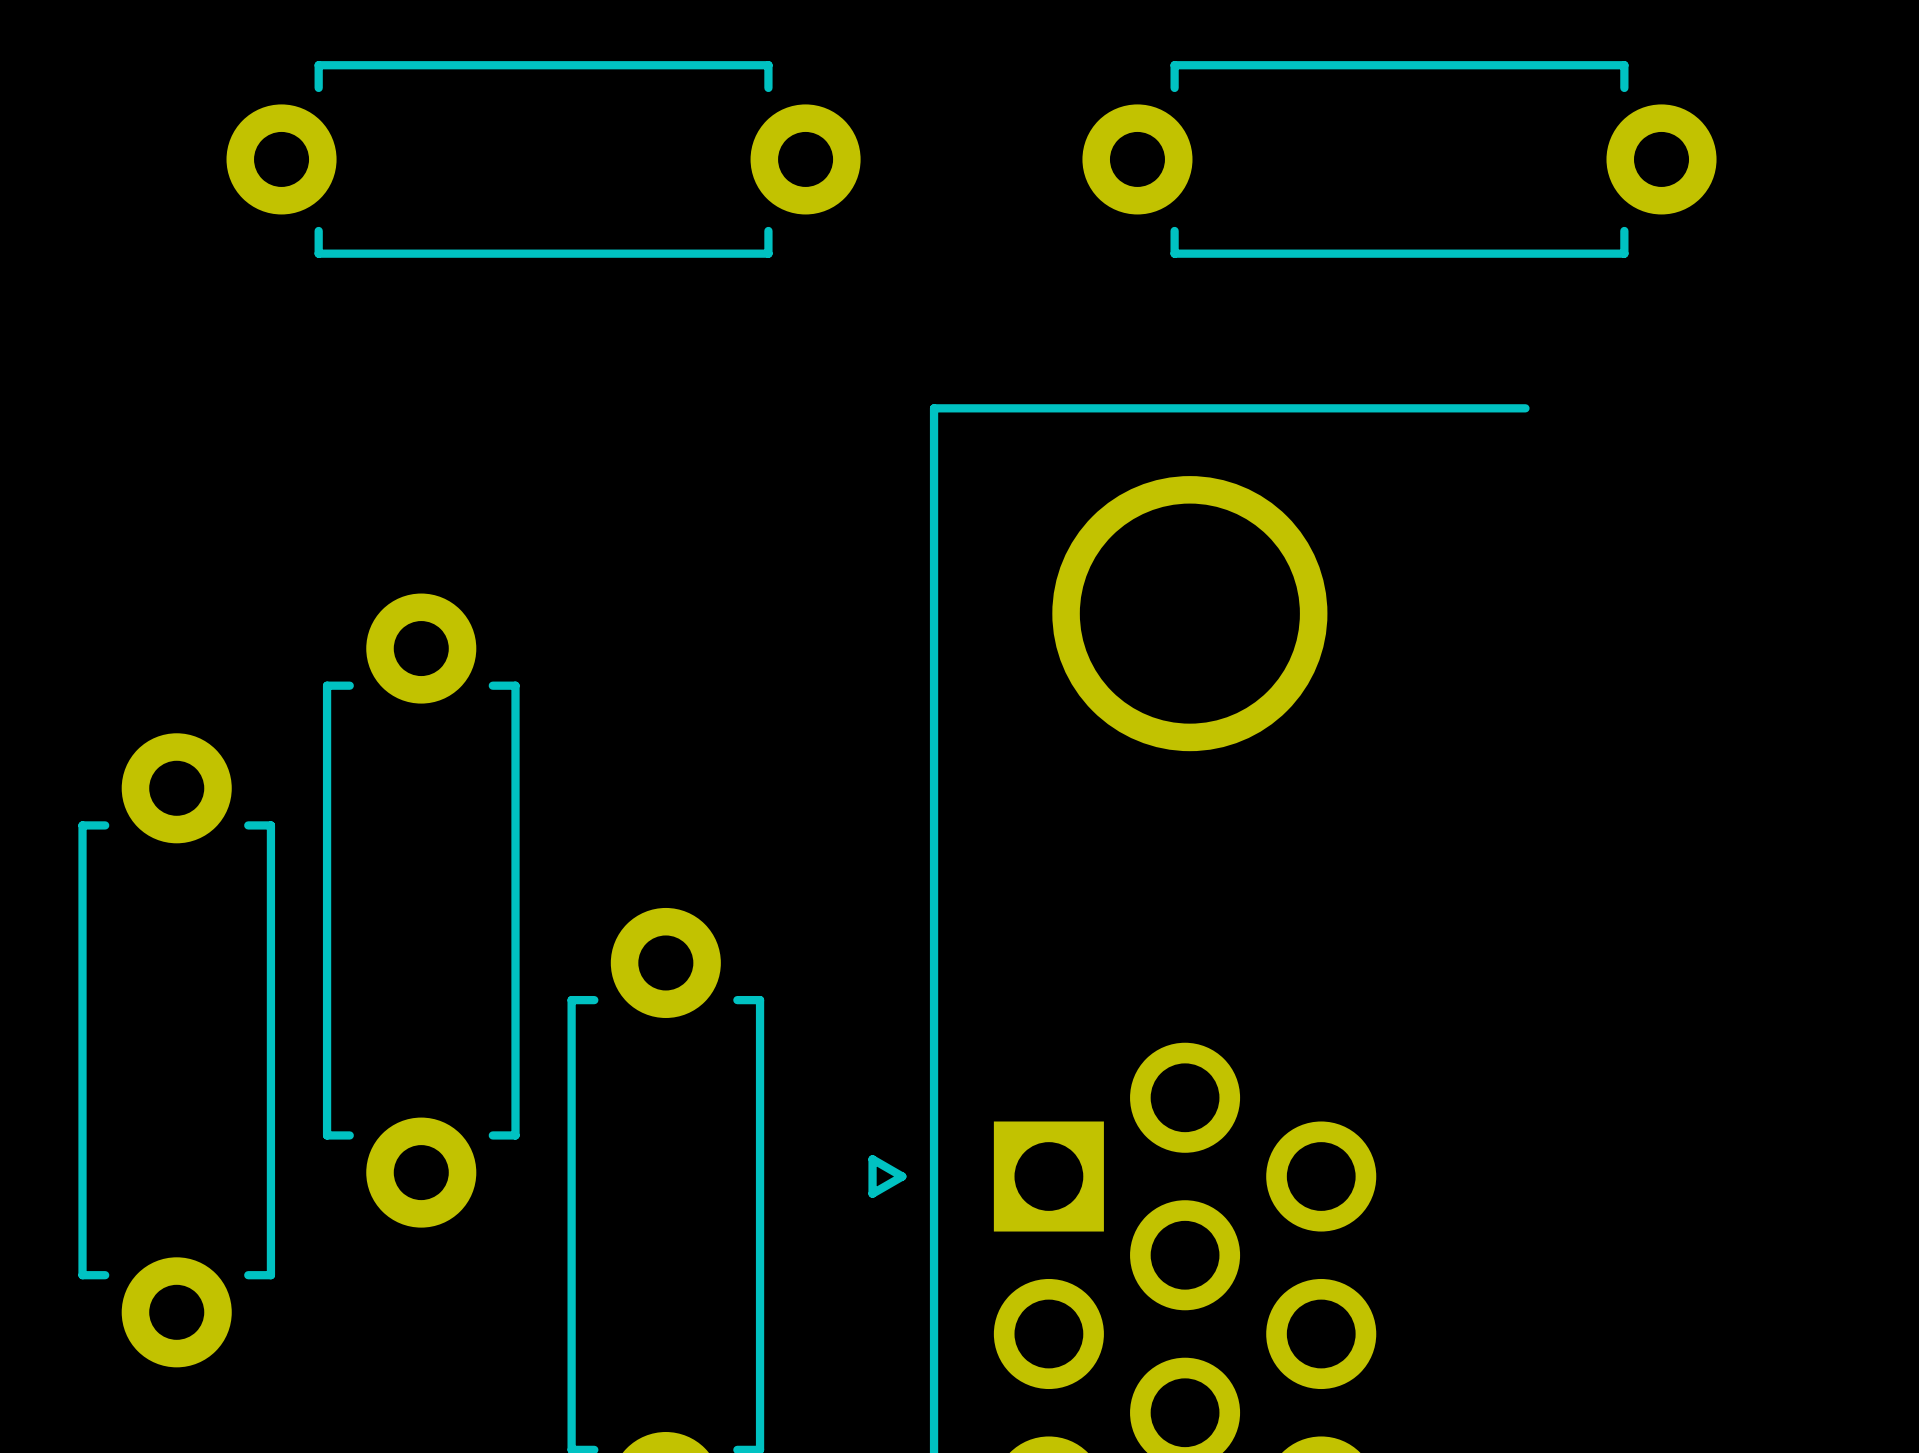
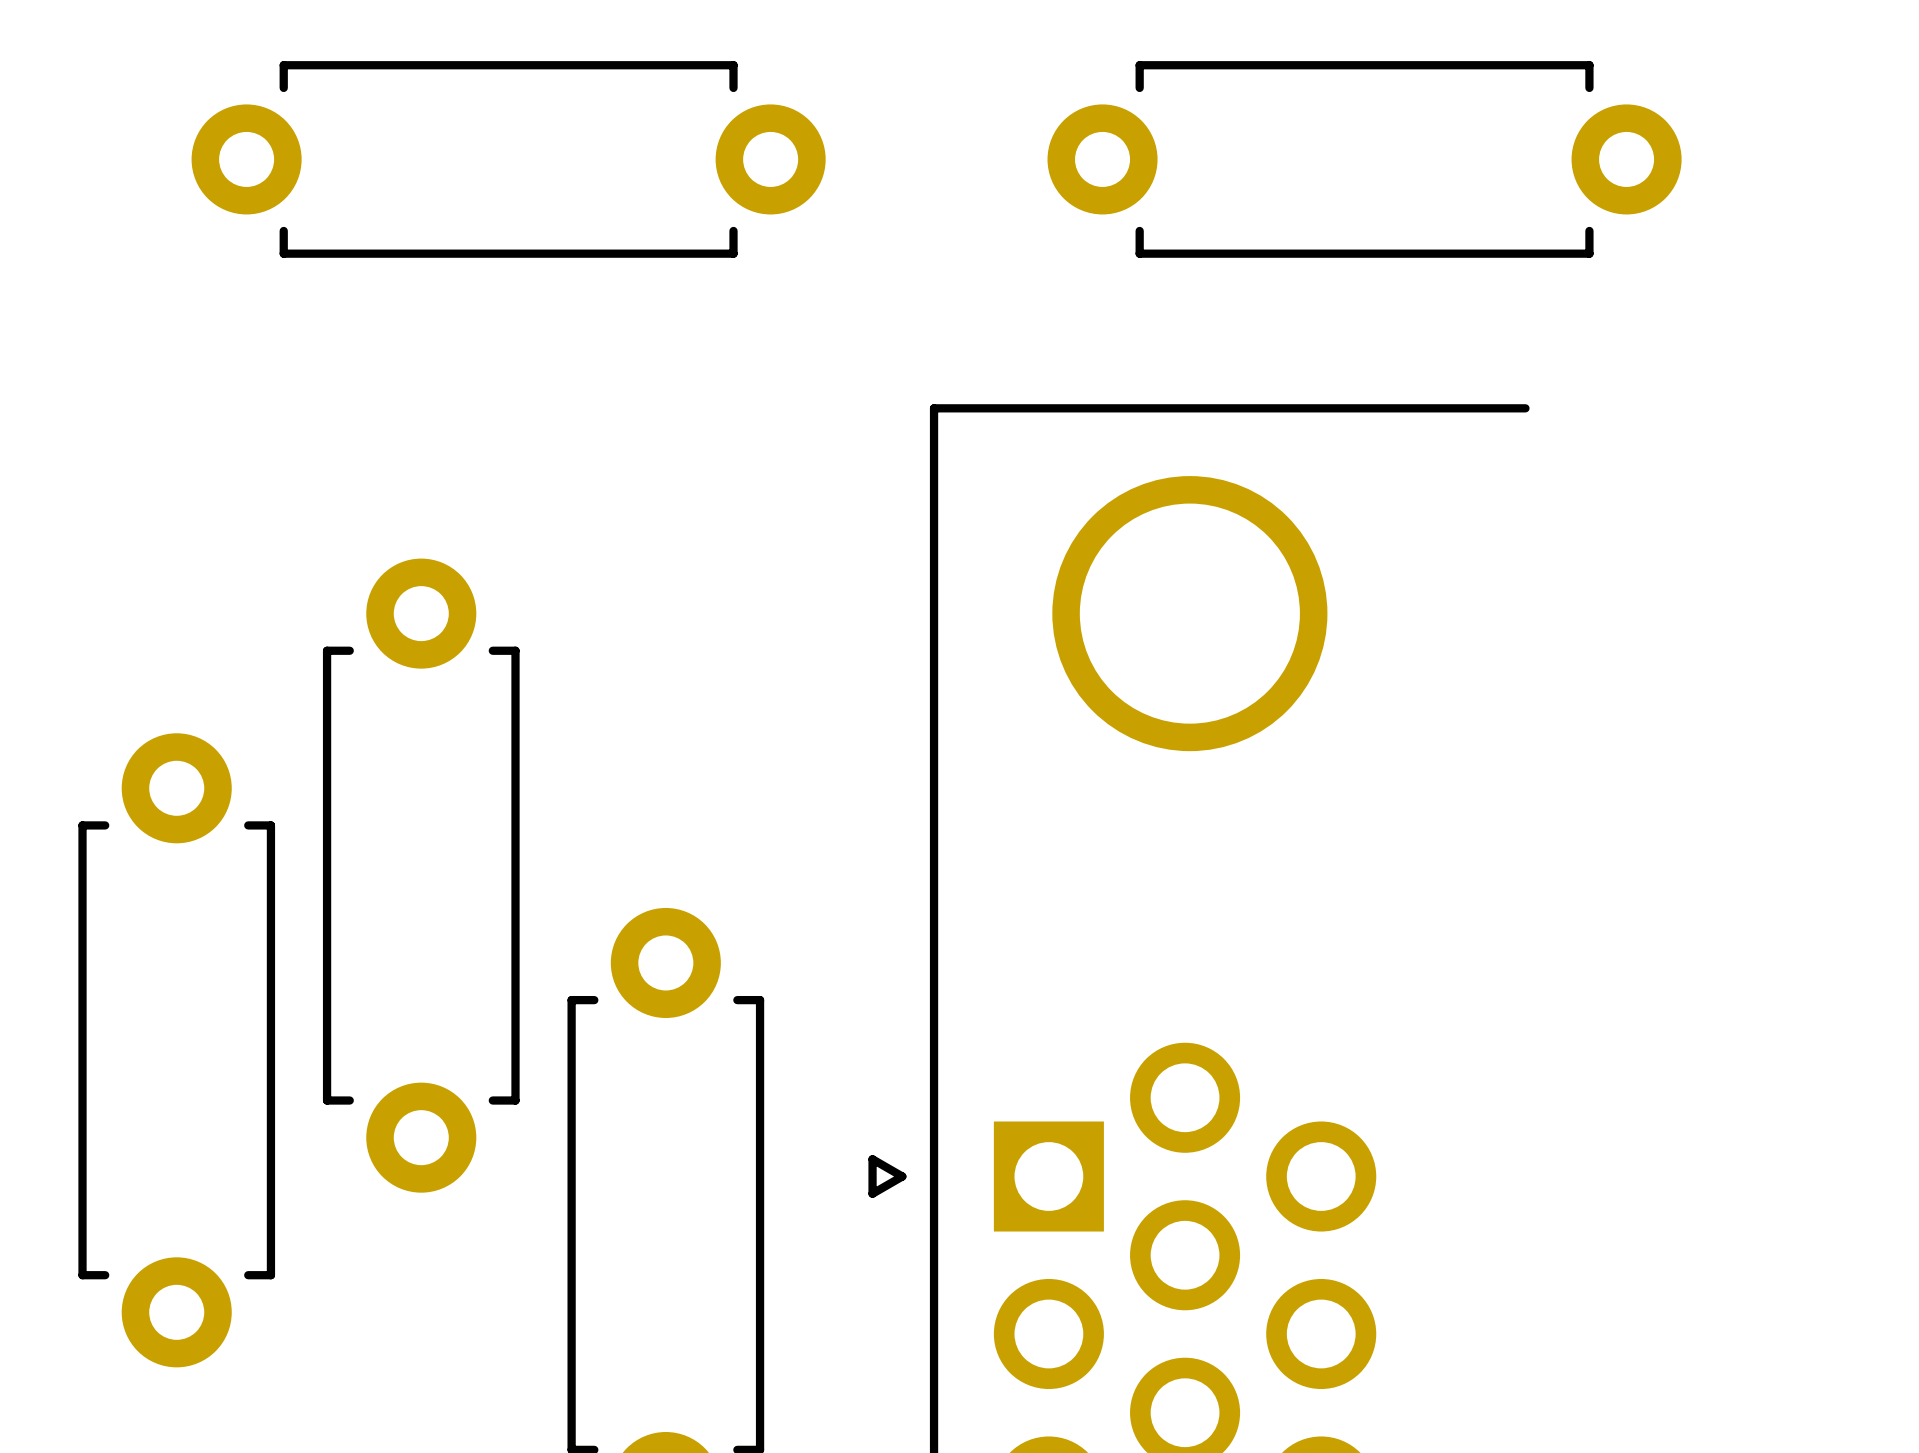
part position: (543, 159) -> (508, 159)
part position: (1399, 159) -> (1364, 159)
part position: (421, 910) -> (421, 875)

